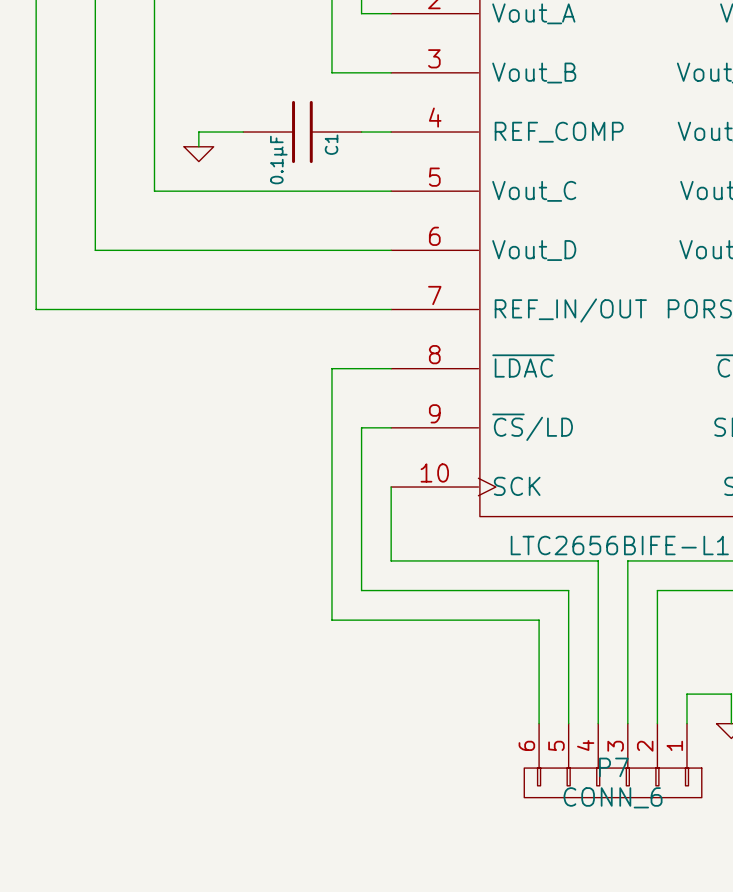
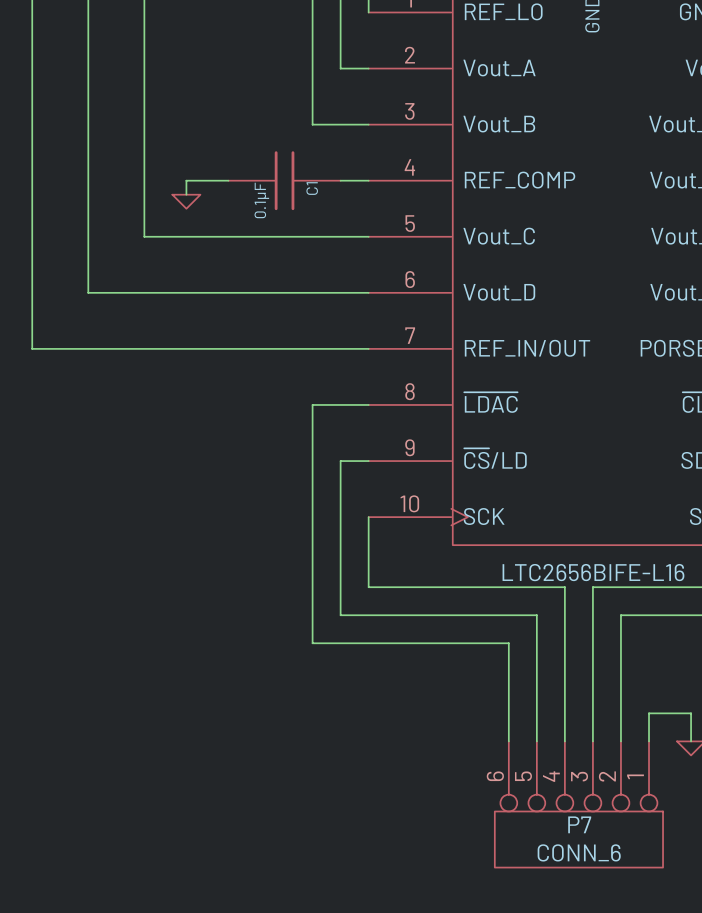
P7 symbol: [524, 723, 702, 798] -> [494, 741, 664, 868]

